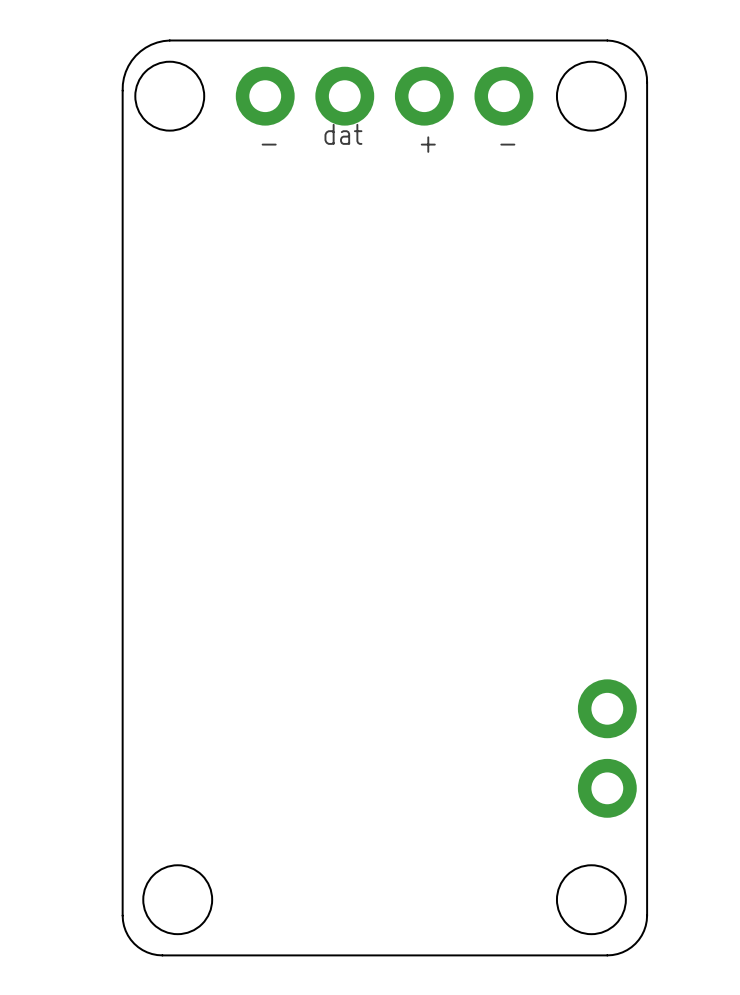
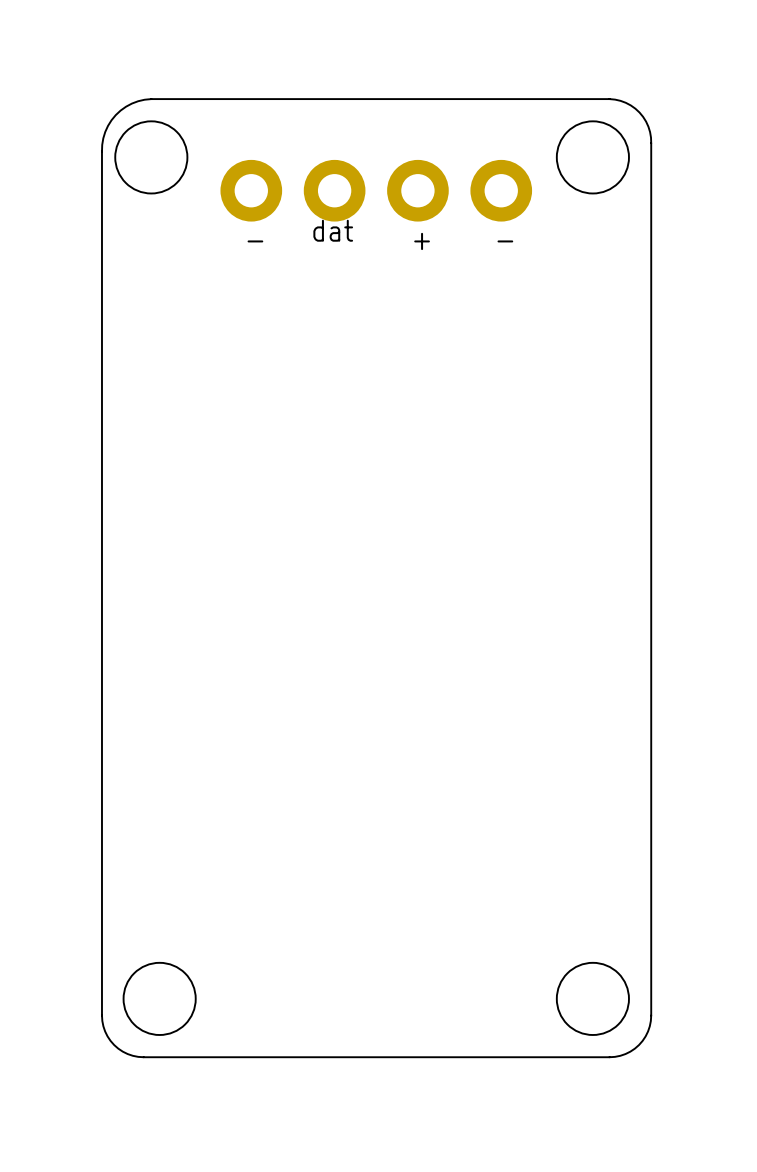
part position: (384, 96) -> (376, 190)
text position: dat (343, 134) -> dat (333, 230)
text position: - (269, 144) -> - (255, 241)
text position: + (428, 144) -> + (422, 241)
text position: - (507, 144) -> - (505, 241)
part: (607, 748) -> none

